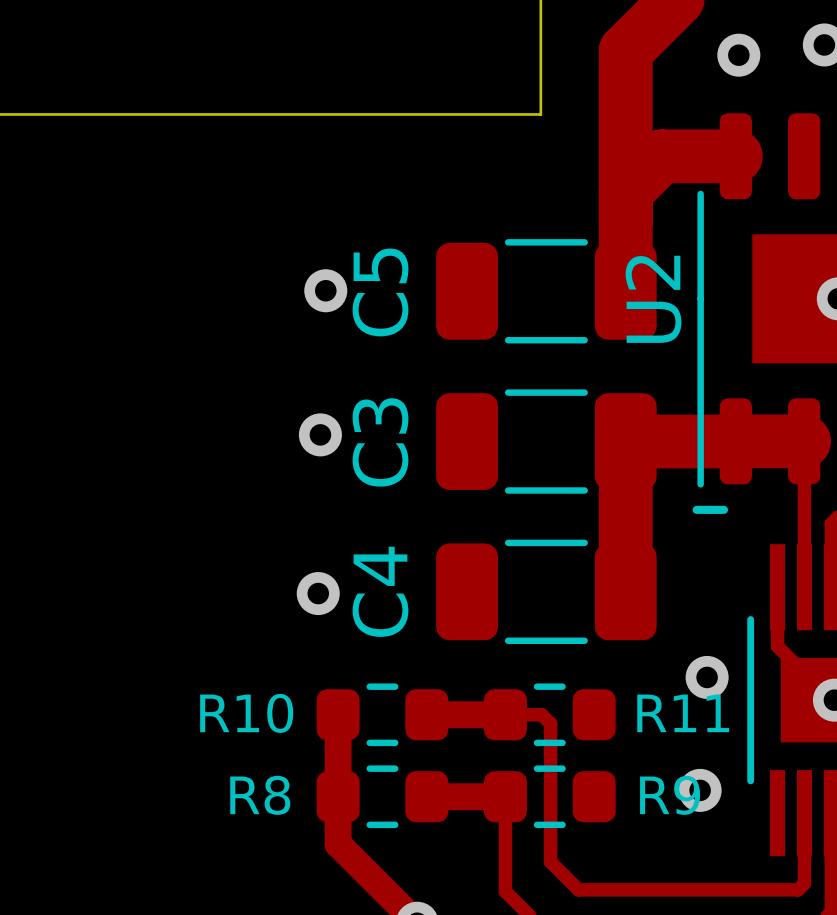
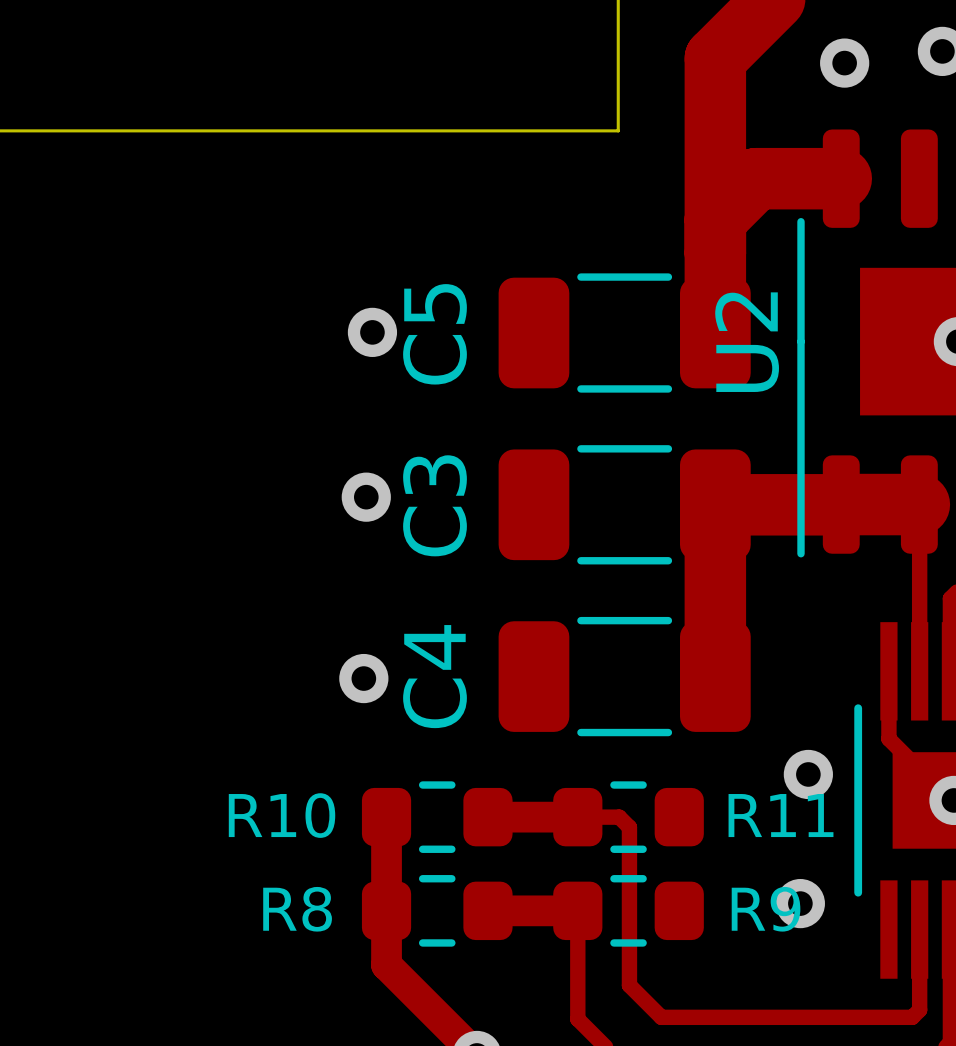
line: (696, 509) (723, 509) -> none

